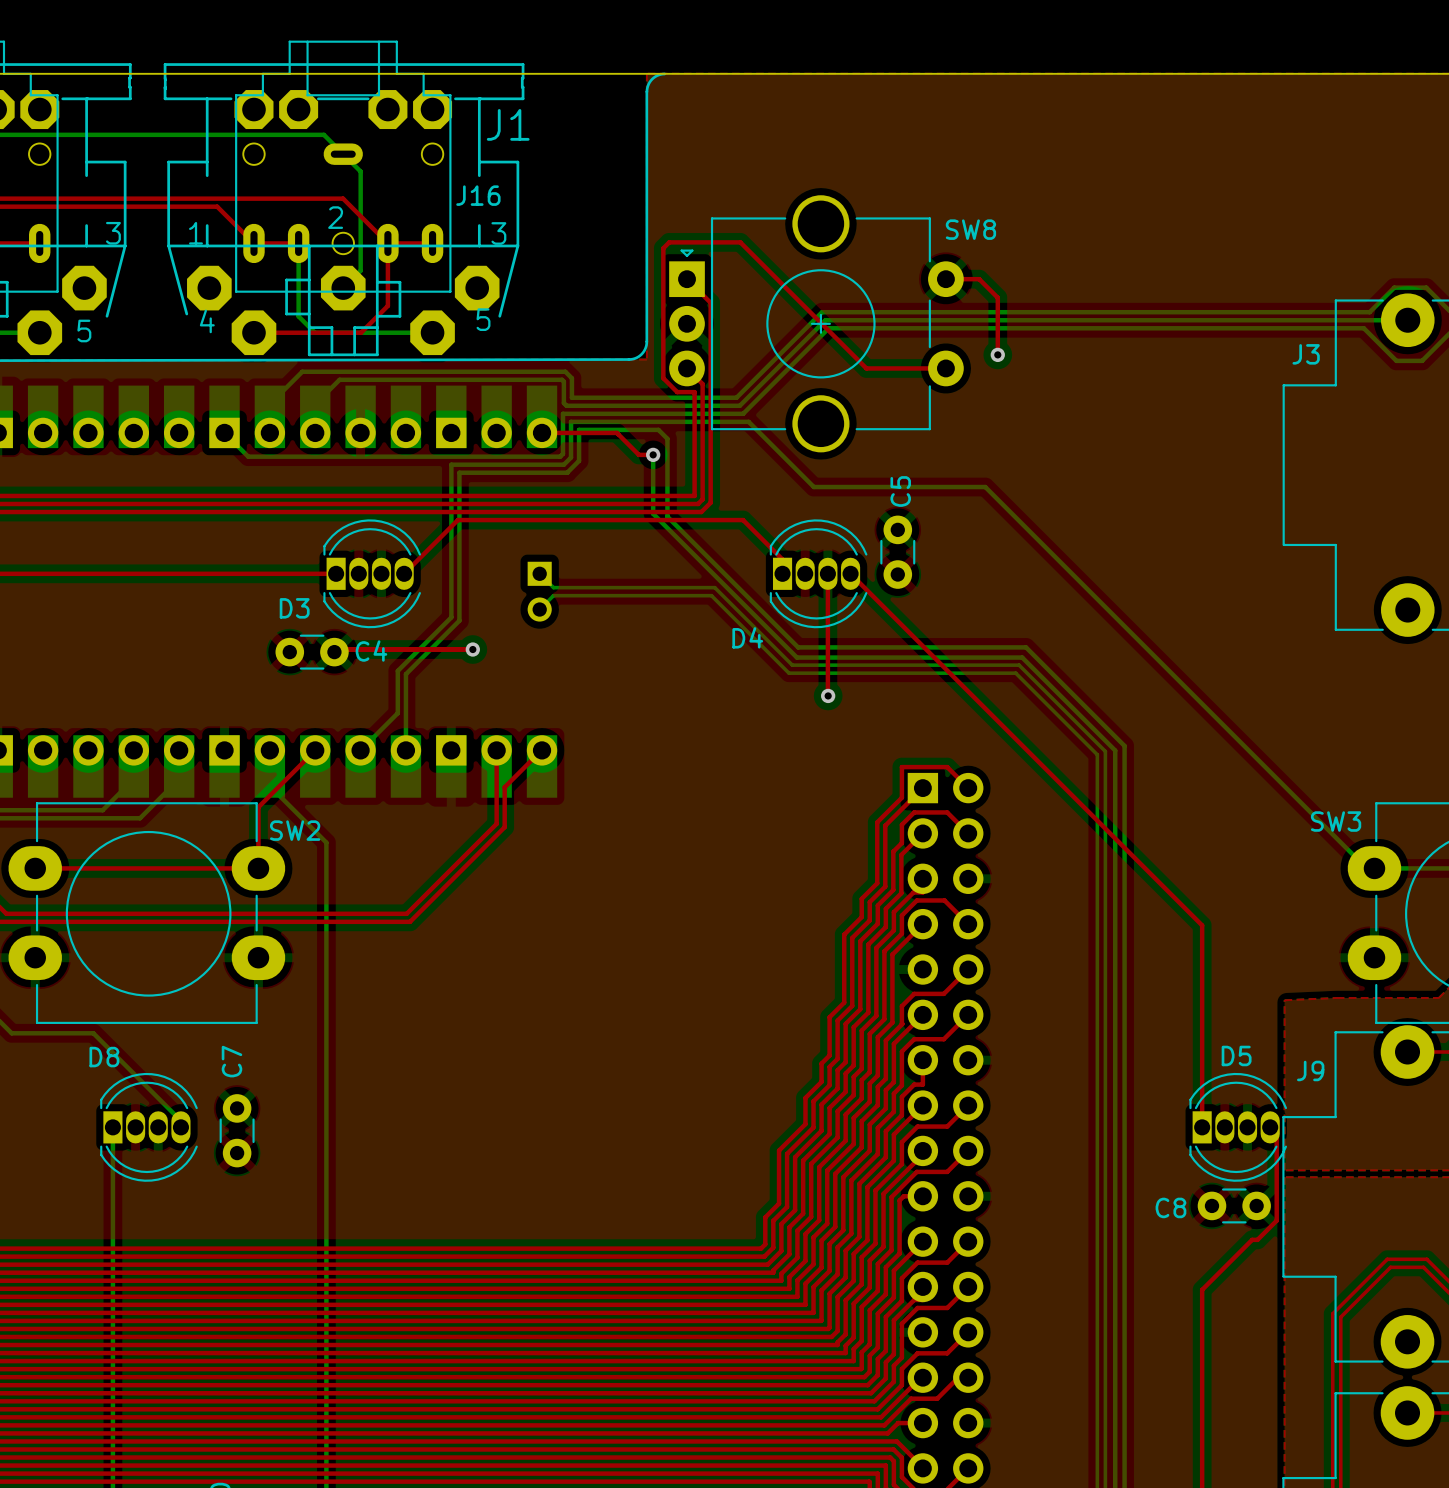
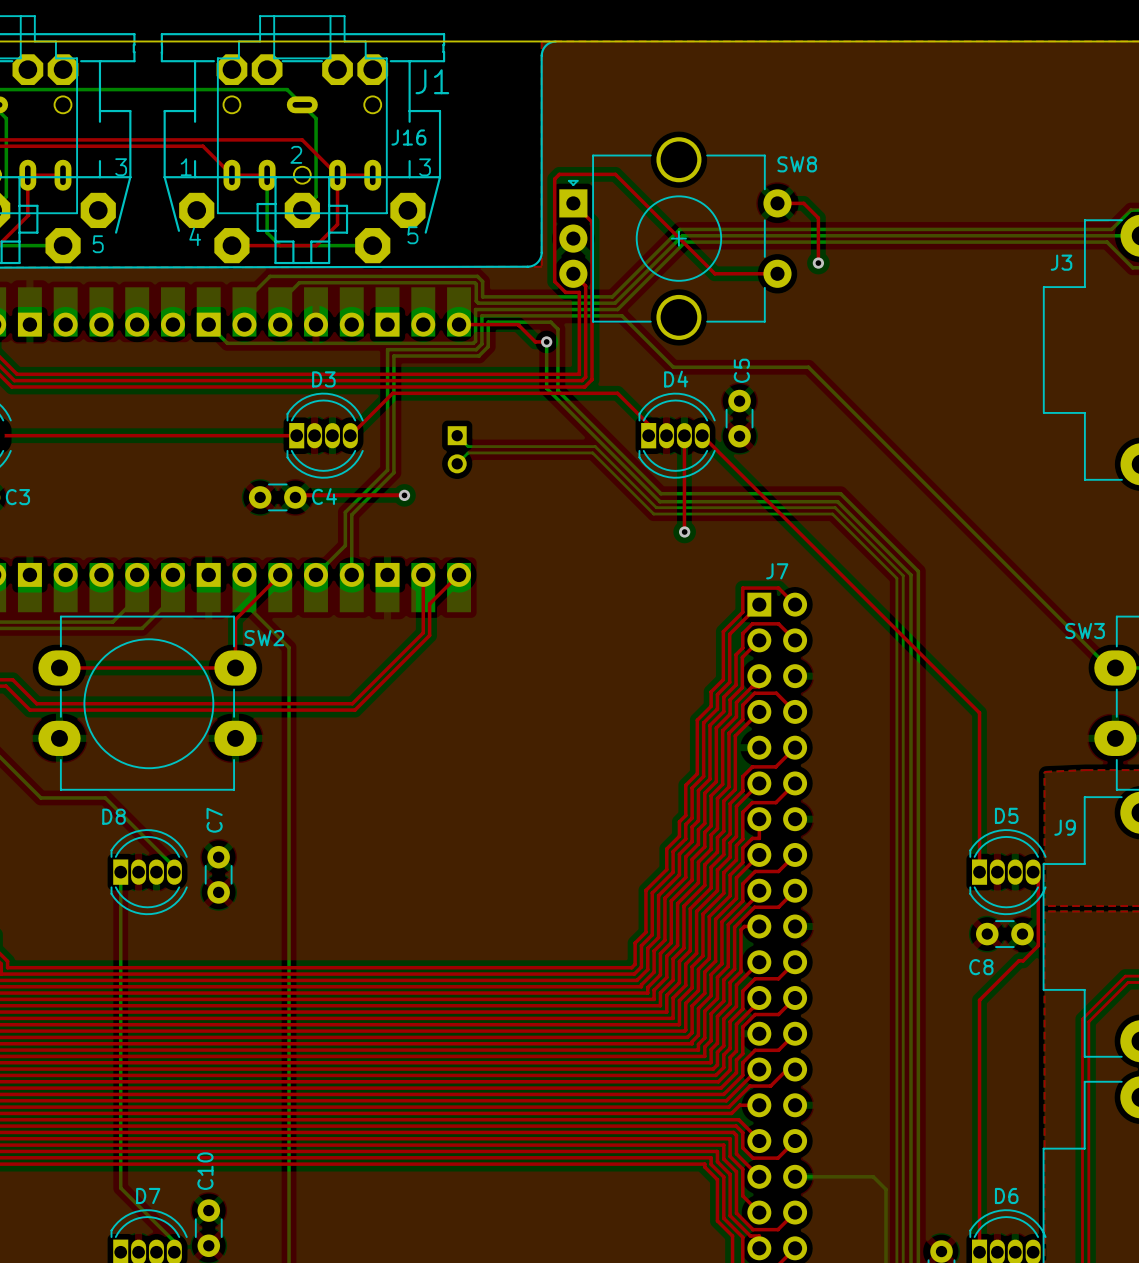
D3 name position: D3 (294, 608) -> D3 (323, 379)
D4 name position: D4 (747, 637) -> D4 (676, 379)
J7 name: none -> J7 (777, 571)
C8 name position: C8 (1170, 1207) -> C8 (981, 967)

